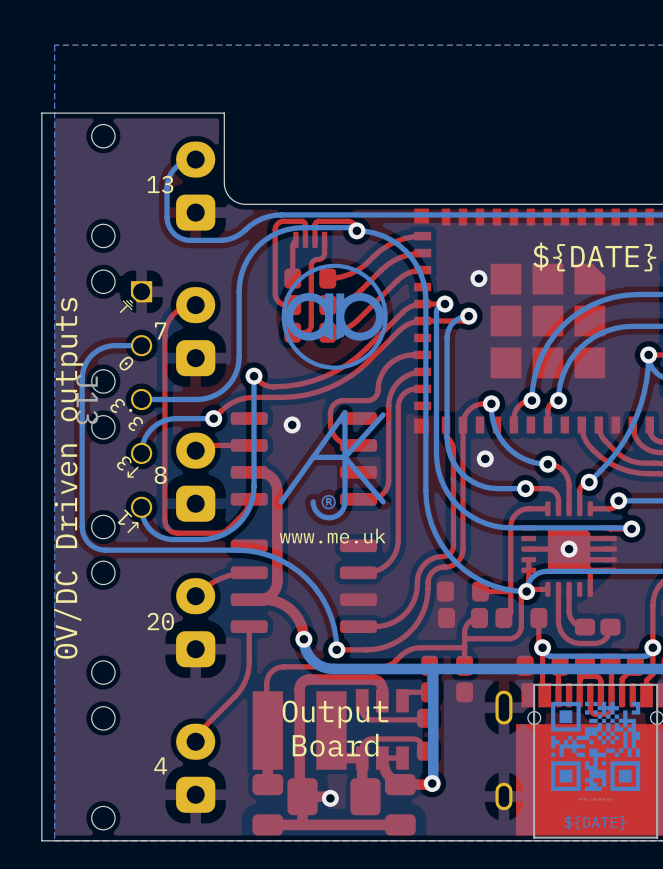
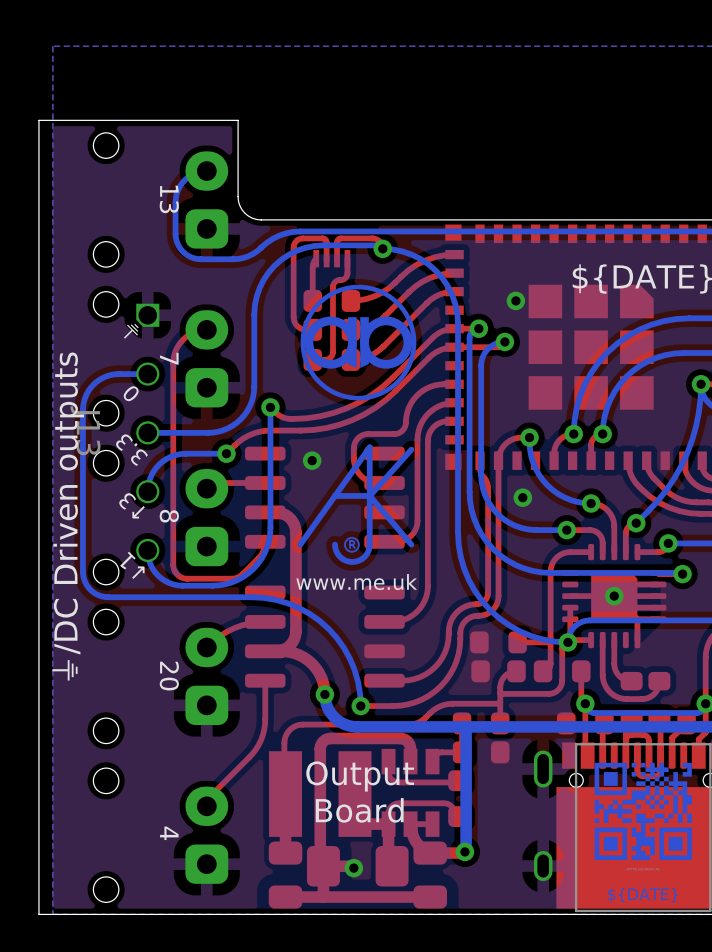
text rotation: 0° (160, 184) -> 90° clockwise (169, 199)
text rotation: 0° (160, 330) -> 90° clockwise (169, 358)
text rotation: 0° (160, 475) -> 90° clockwise (169, 516)
text: 0V/DC Driven outputs (68, 478) -> ⏚/DC Driven outputs (68, 516)
text rotation: 0° (160, 621) -> 90° clockwise (169, 676)
text rotation: 0° (160, 765) -> 90° clockwise (169, 833)

